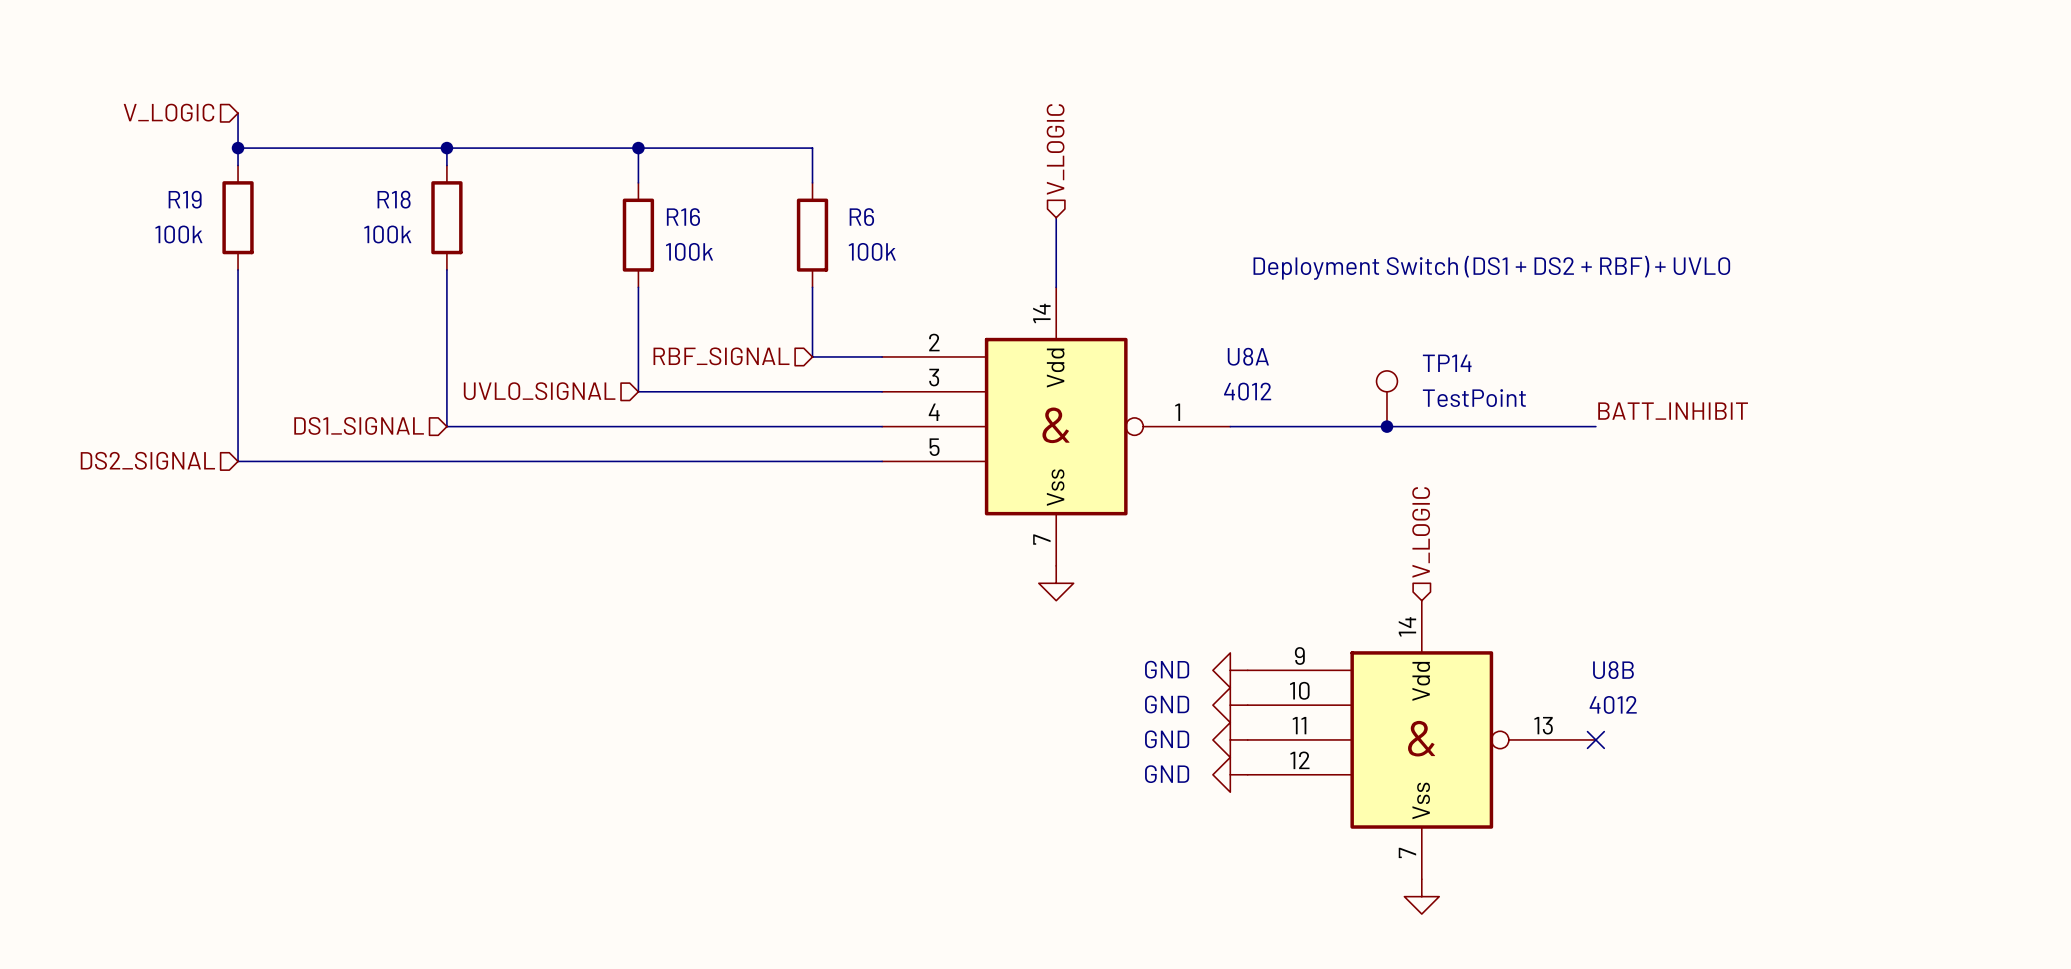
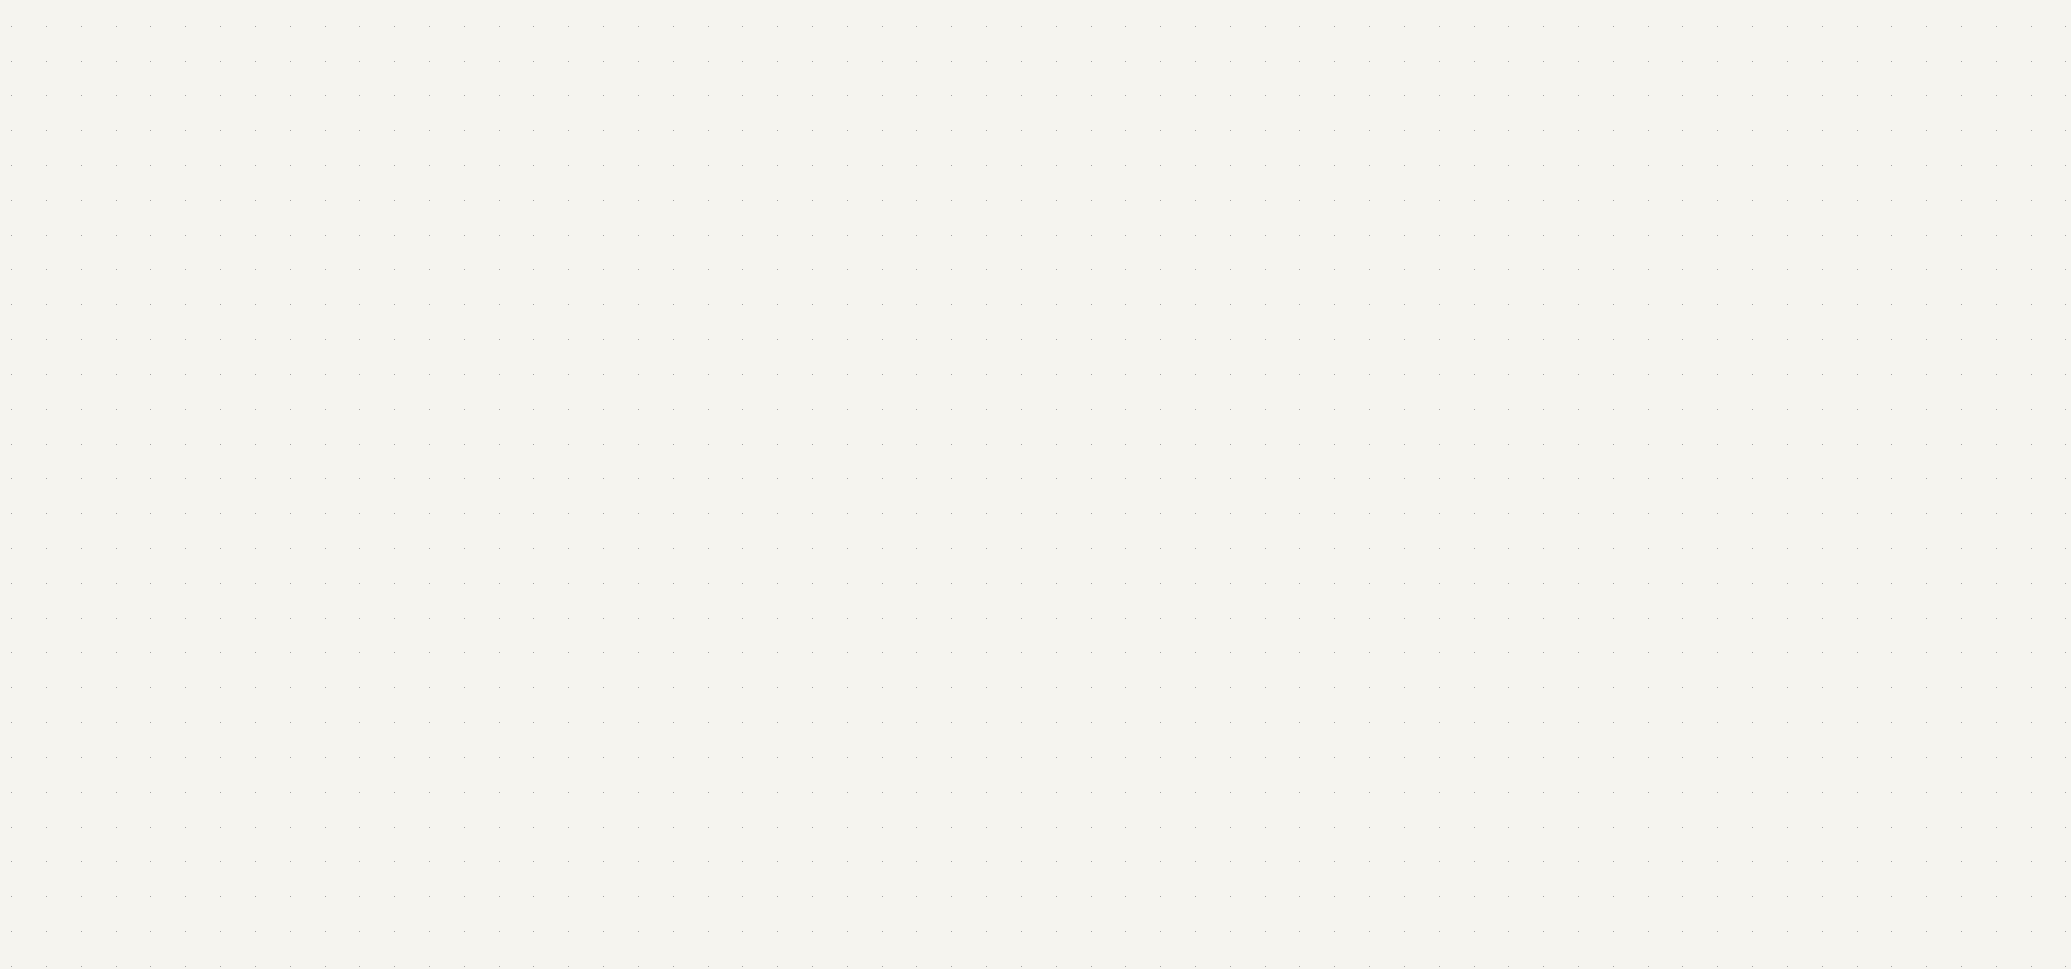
hierarchical label: V_LOGIC (169, 112) -> none
wire: (238, 113) (238, 165) -> none
wire: (238, 148) (812, 148) (812, 182) -> none
junction: (238, 148) -> none
wire: (446, 148) (446, 165) -> none
junction: (446, 148) -> none
wire: (638, 148) (638, 182) -> none
junction: (638, 148) -> none
hierarchical label: V_LOGIC (1055, 149) -> none
R19: 100k (238, 217) -> none
R18: 100k (446, 217) -> none
wire: (1056, 217) (1056, 287) -> none
R16: 100k (638, 235) -> none
R6: 100k (812, 235) -> none
text: Deployment Switch (DS1 + DS2 + RBF) + UVLO (1491, 267) -> none
wire: (238, 269) (238, 461) (882, 461) -> none
wire: (446, 269) (446, 426) (882, 426) -> none
wire: (638, 287) (638, 391) (882, 391) -> none
wire: (812, 287) (812, 356) (882, 356) -> none
hierarchical label: RBF_SIGNAL (721, 356) -> none
hierarchical label: UVLO_SIGNAL (539, 391) -> none
TP14: TestPoint (1386, 398) -> none
label: BATT_INHIBIT (1673, 411) -> none
hierarchical label: DS1_SIGNAL (359, 425) -> none
U8A: 4012 (1056, 426) -> none
wire: (1230, 426) (1595, 426) -> none
junction: (1386, 426) -> none
hierarchical label: DS2_SIGNAL (147, 460) -> none
hierarchical label: V_LOGIC (1421, 532) -> none
power symbol: (1056, 583) -> none
power symbol: GND (1230, 670) -> none
power symbol: GND (1230, 705) -> none
power symbol: GND (1230, 739) -> none
U8B: 4012 (1421, 739) -> none
no-connect mark: (1595, 739) -> none
power symbol: GND (1230, 774) -> none
power symbol: (1421, 896) -> none

